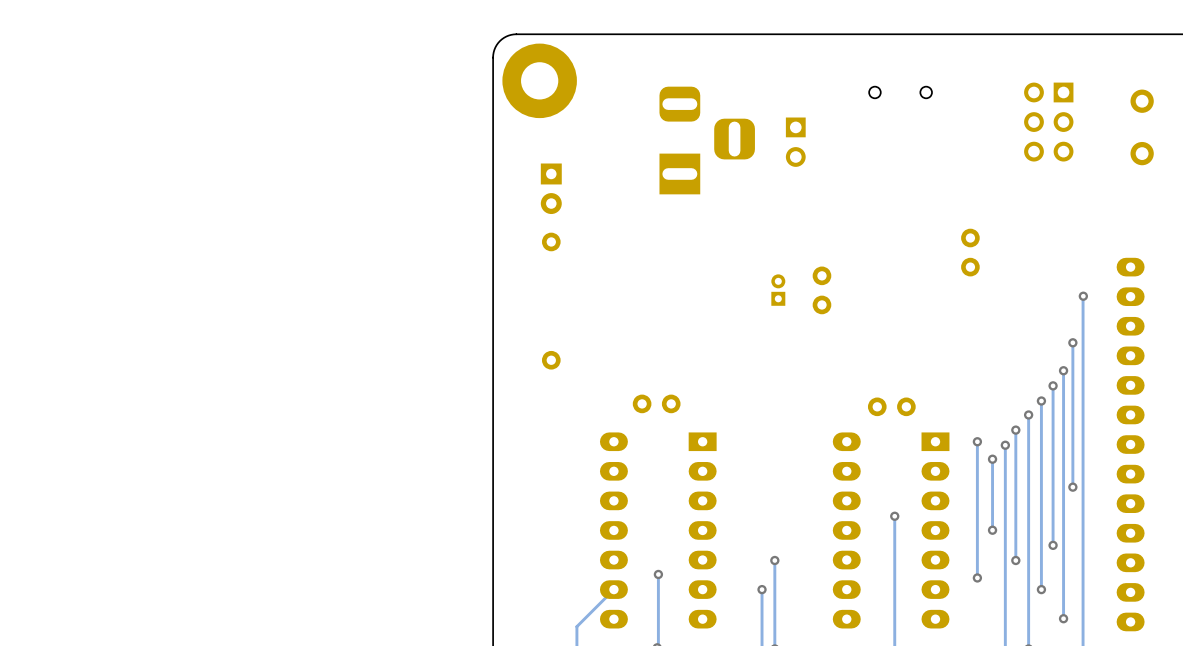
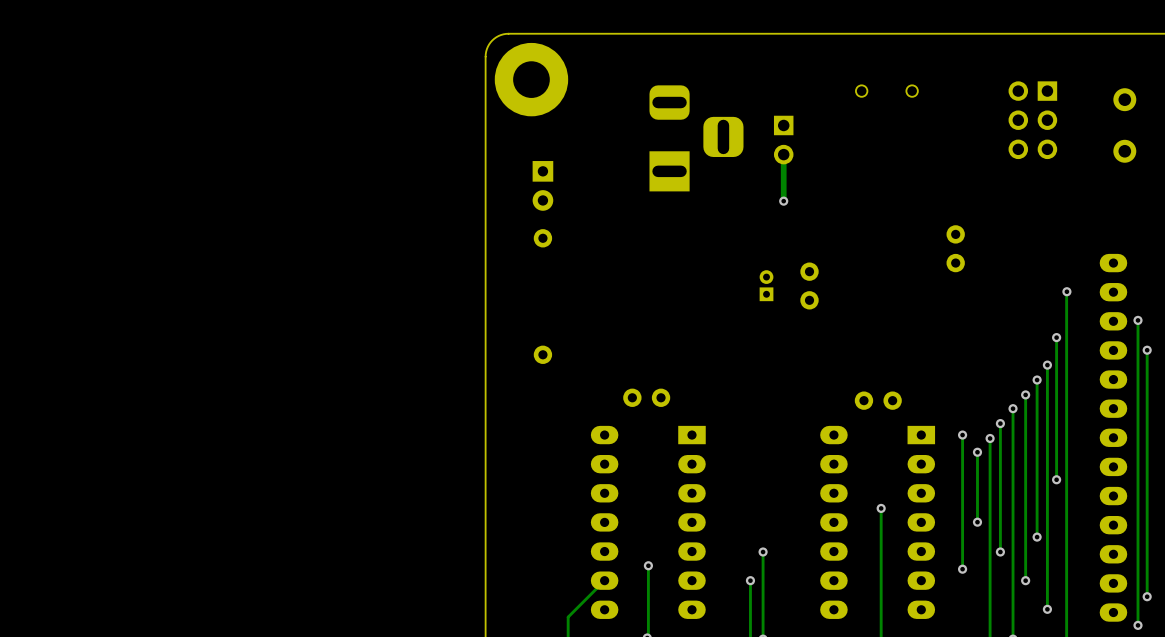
track: none -> (783, 154) (783, 201)
via: none -> (783, 201)
track: none -> (1138, 320) (1138, 625)
via: none -> (1138, 320)
track: none -> (1147, 350) (1147, 596)
via: none -> (1147, 350)
via: none -> (1147, 596)
via: none -> (1138, 625)

